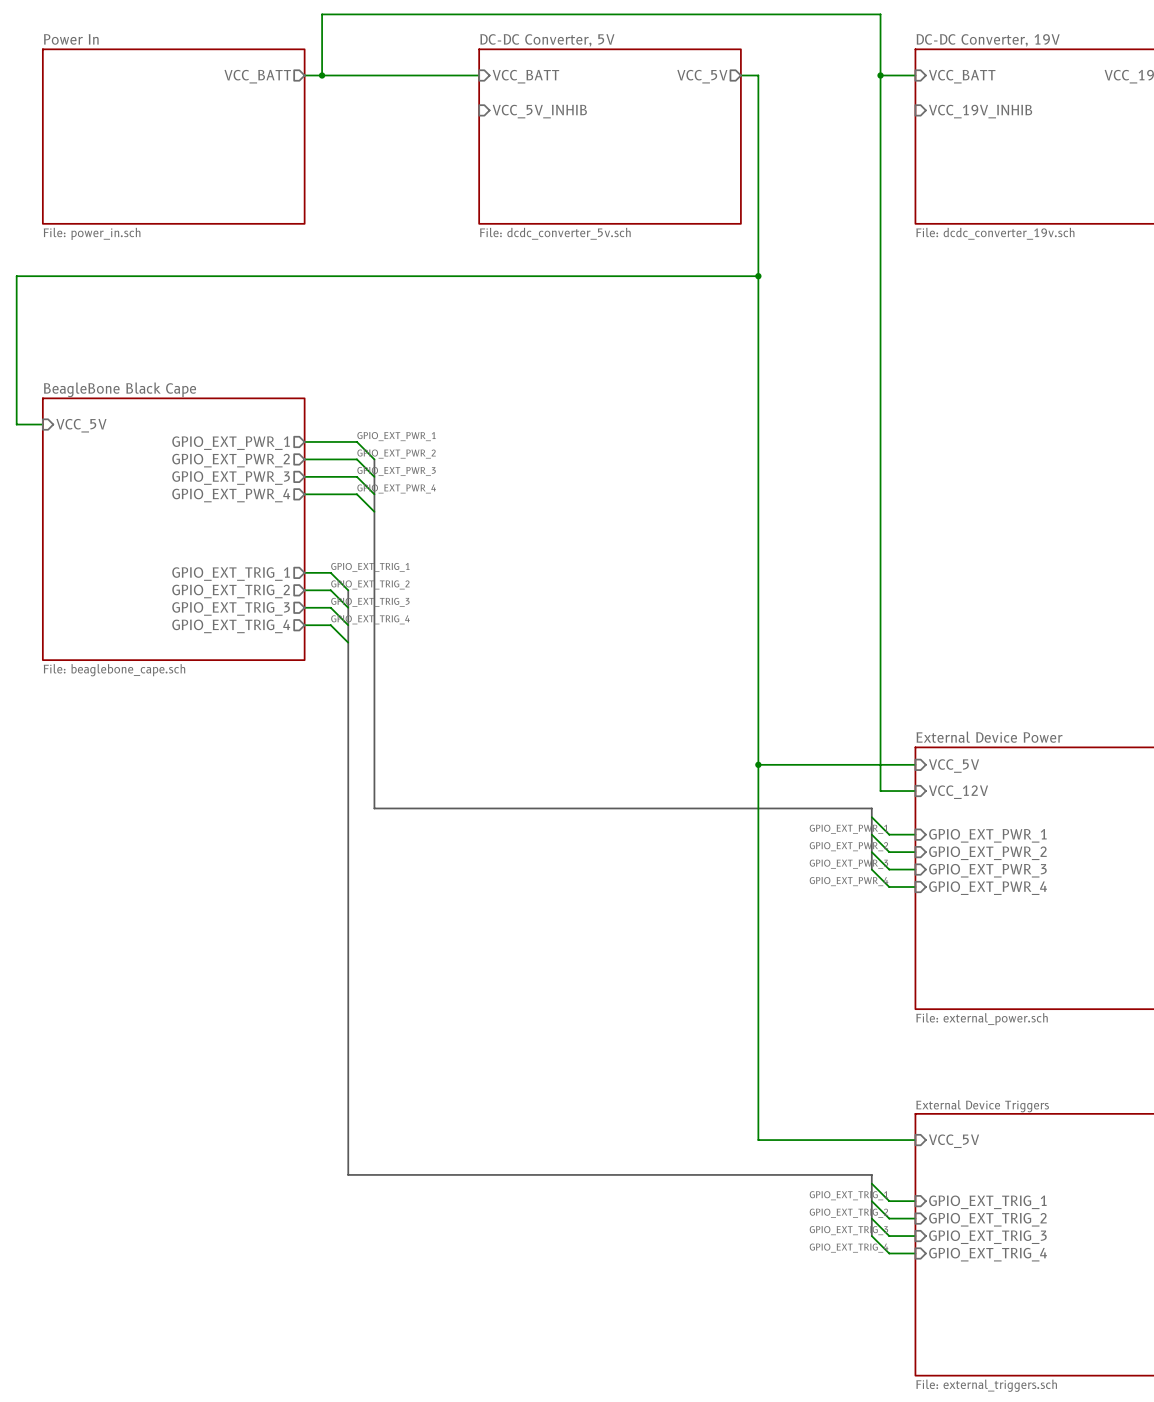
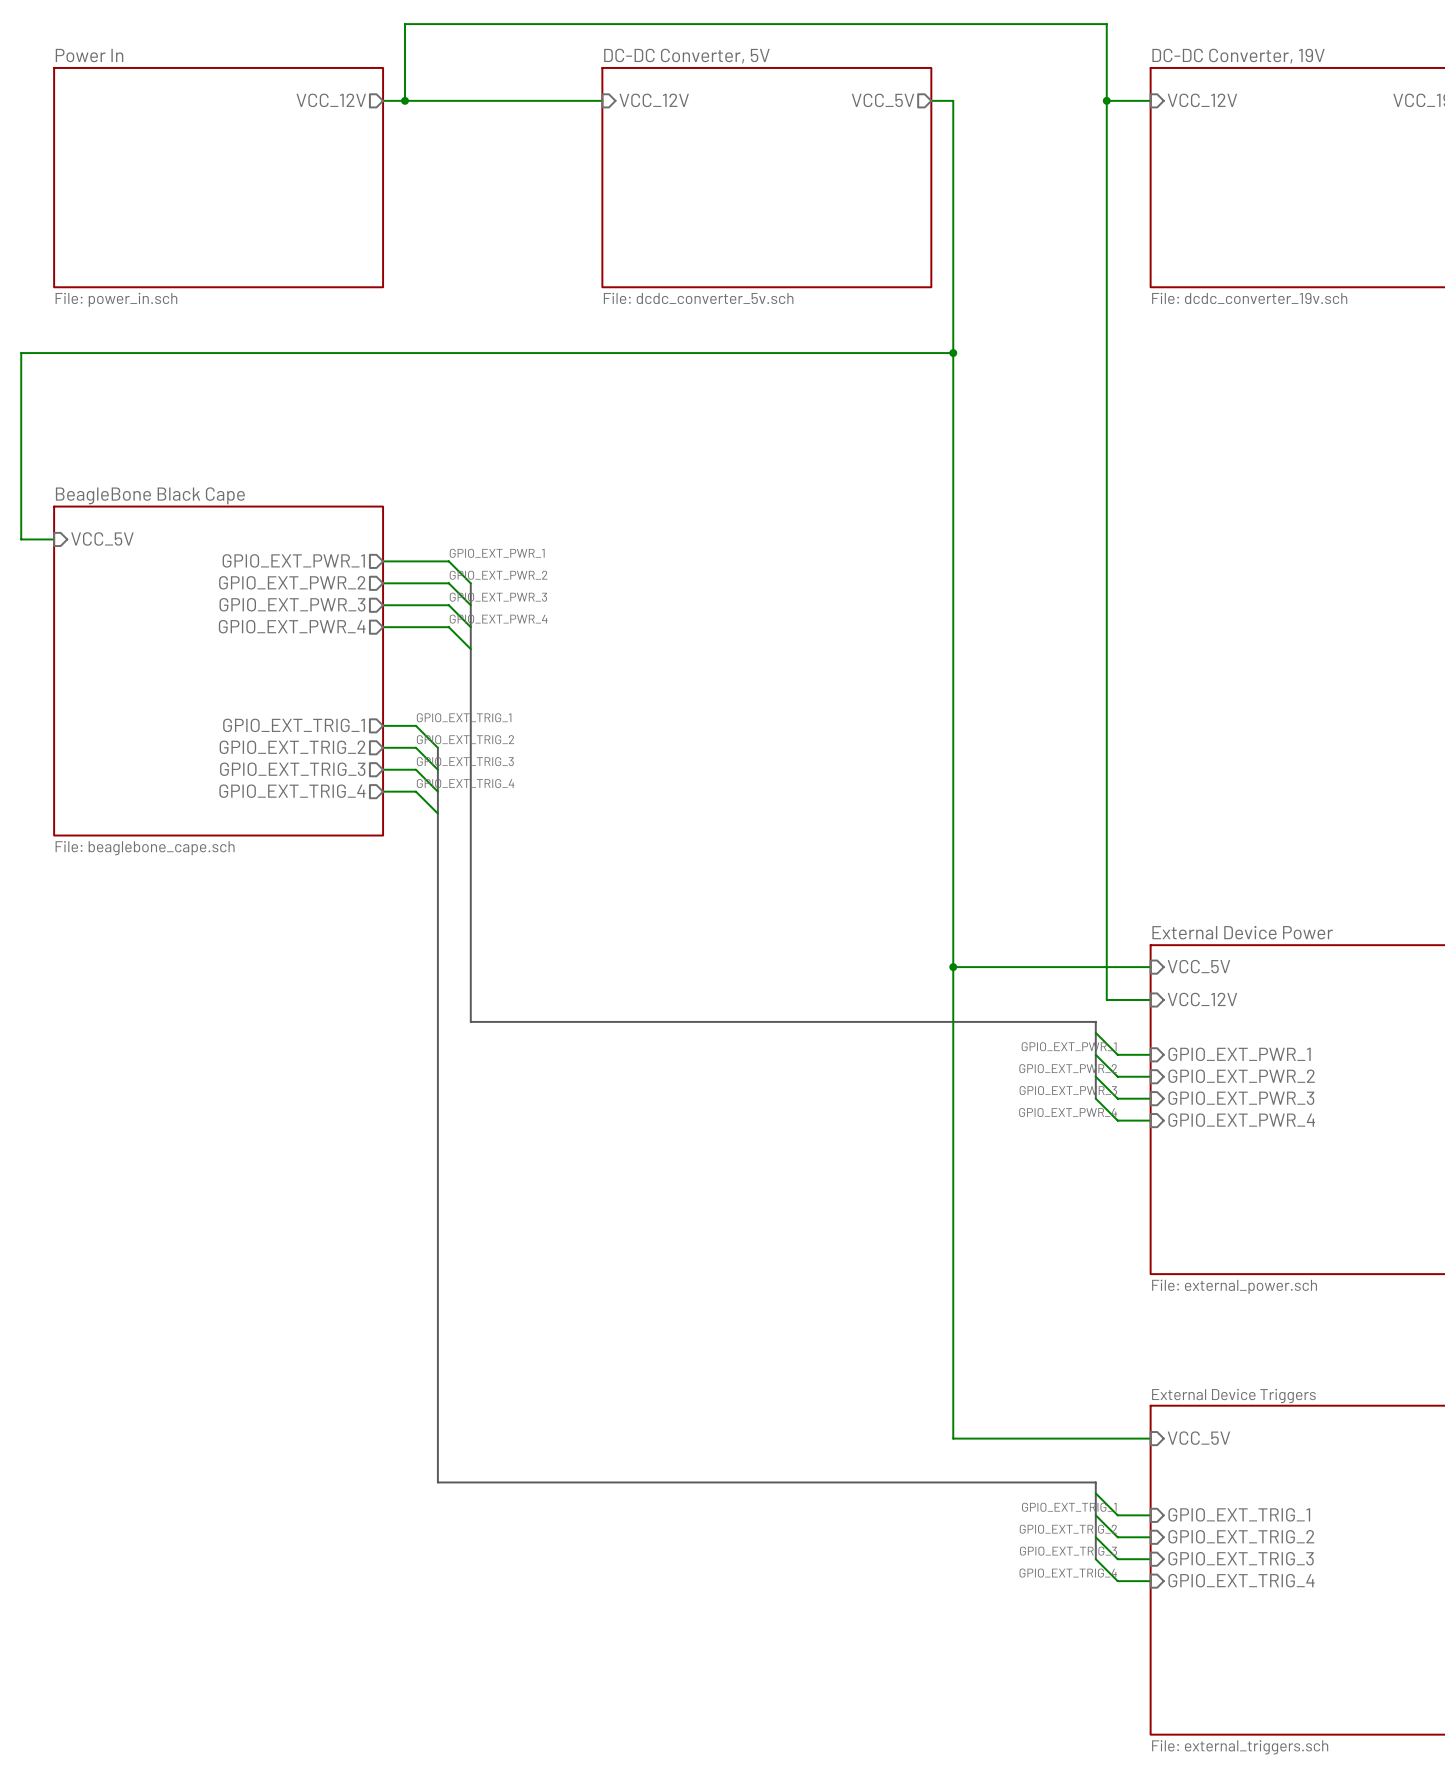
sheet pin: VCC_BATT (257, 76) -> VCC_12V (331, 100)
sheet pin: VCC_BATT (525, 76) -> VCC_12V (654, 100)
sheet pin: VCC_BATT (962, 76) -> VCC_12V (1202, 100)
sheet pin: VCC_5V_INHIB (539, 111) -> none
sheet pin: VCC_19V_INHIB (980, 111) -> none

